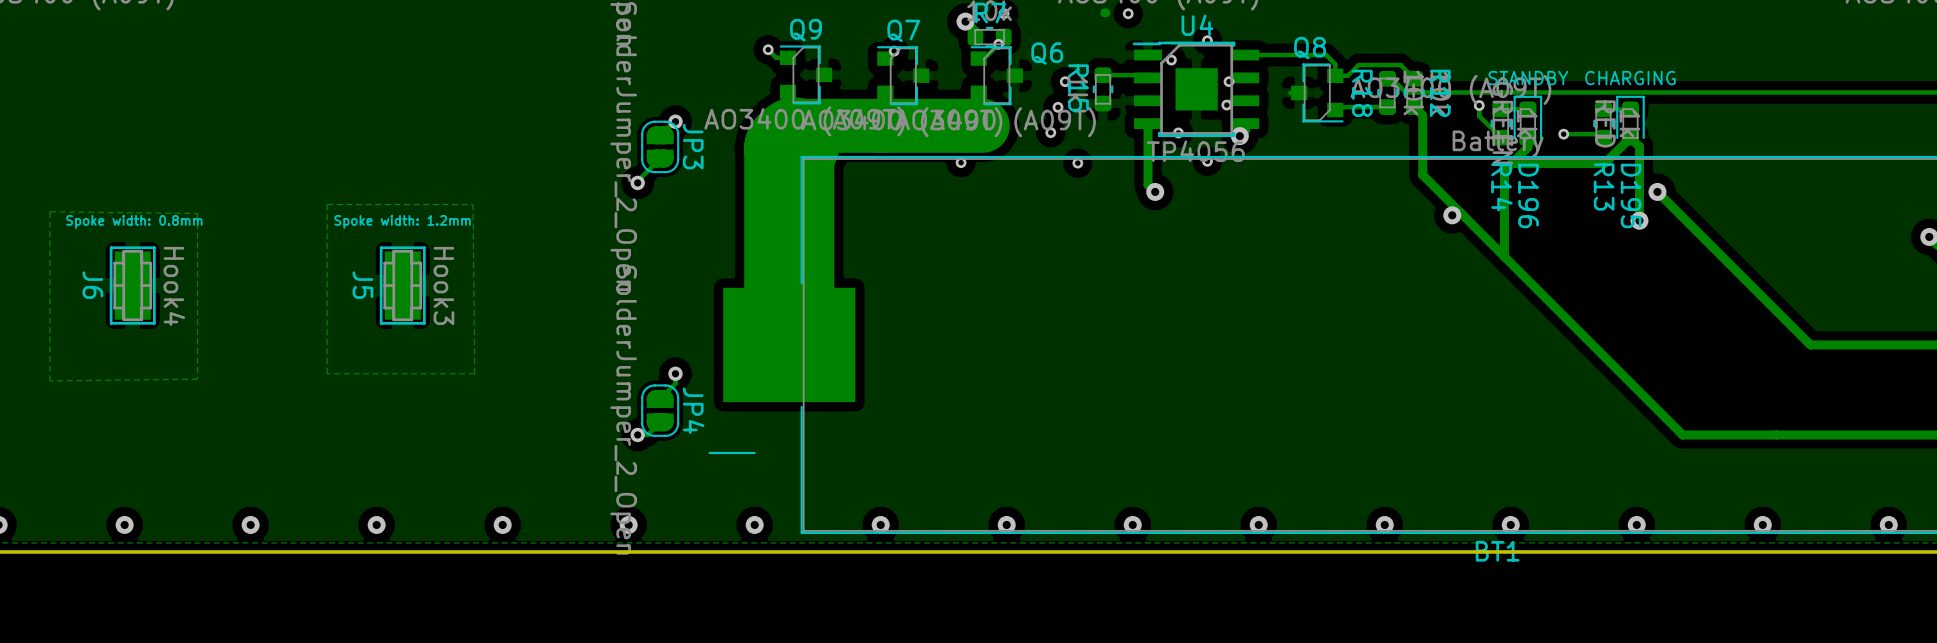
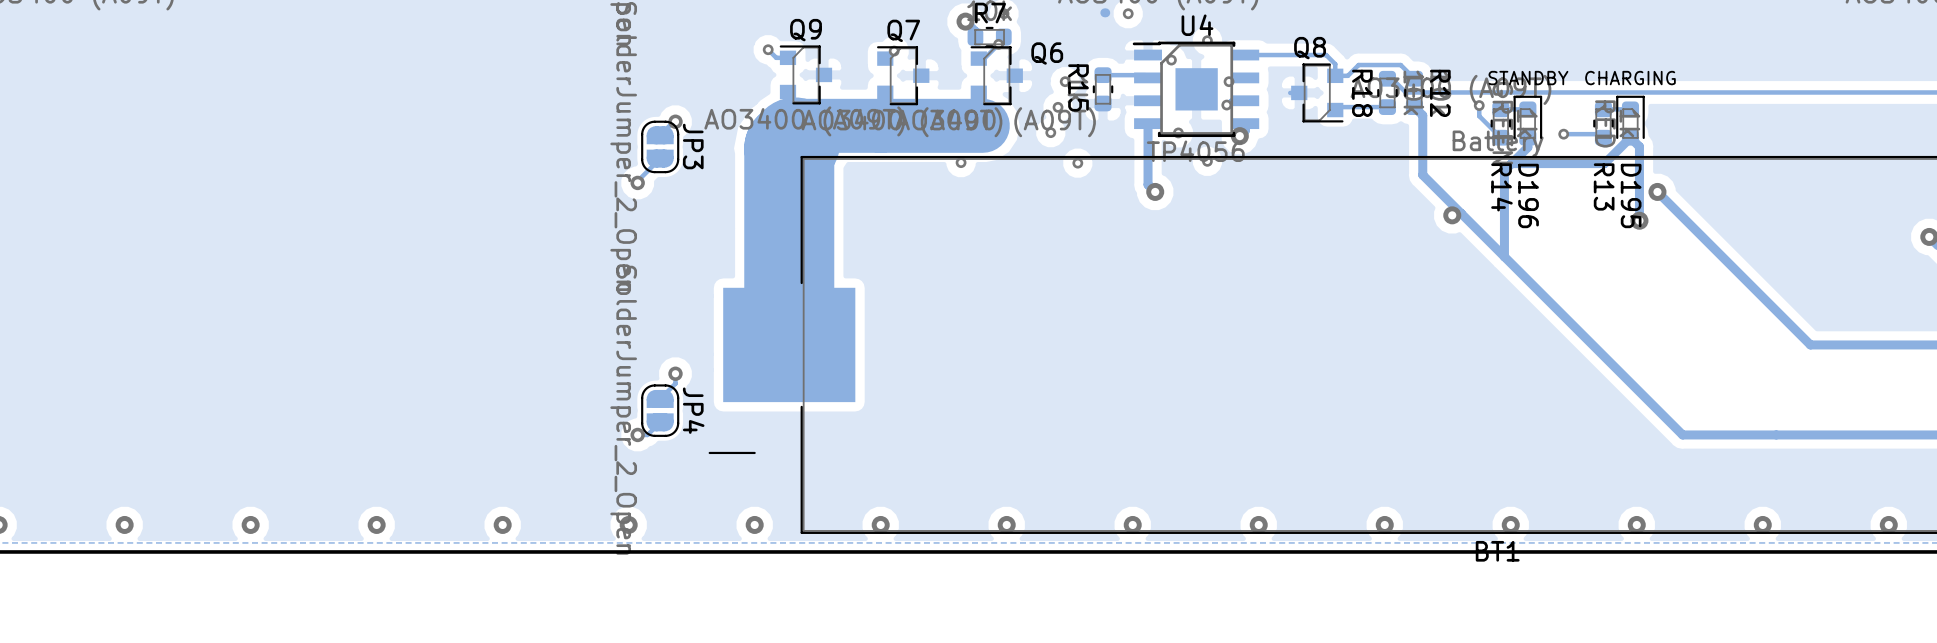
zone outline: (472, 204) (327, 204) (327, 373) (474, 373) (472, 204) -> none
zone outline: (49, 211) (197, 213) (197, 379) (49, 380) (49, 211) -> none
text: Spoke width: 0.8mm (134, 221) -> none
text: Spoke width: 1.2mm (402, 221) -> none
J6: Hook4 (132, 285) -> none
J5: Hook3 (402, 285) -> none

